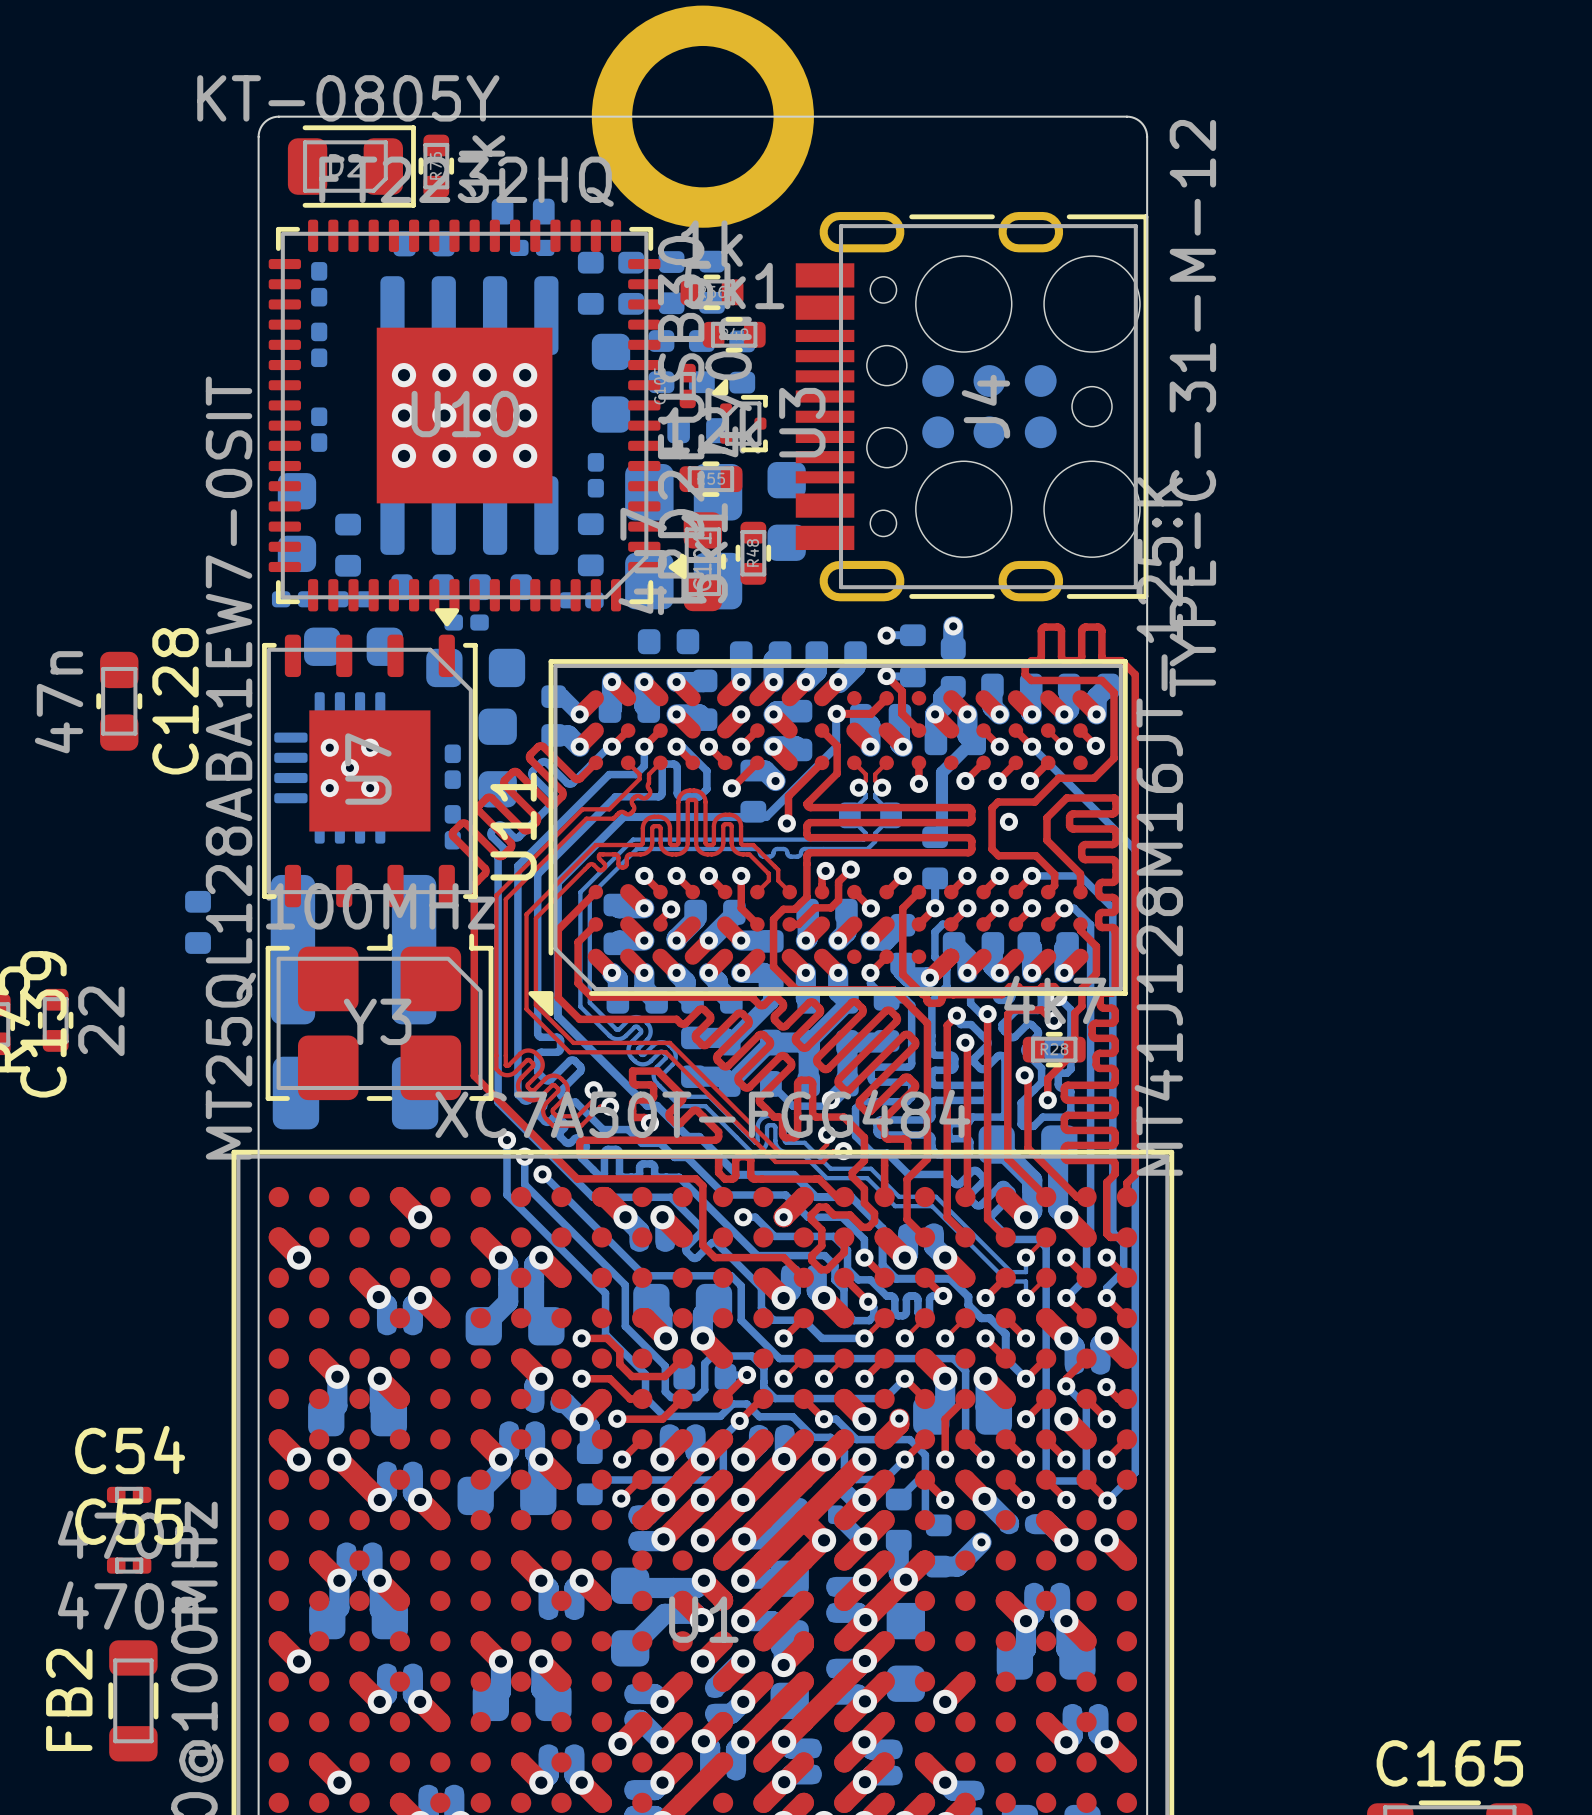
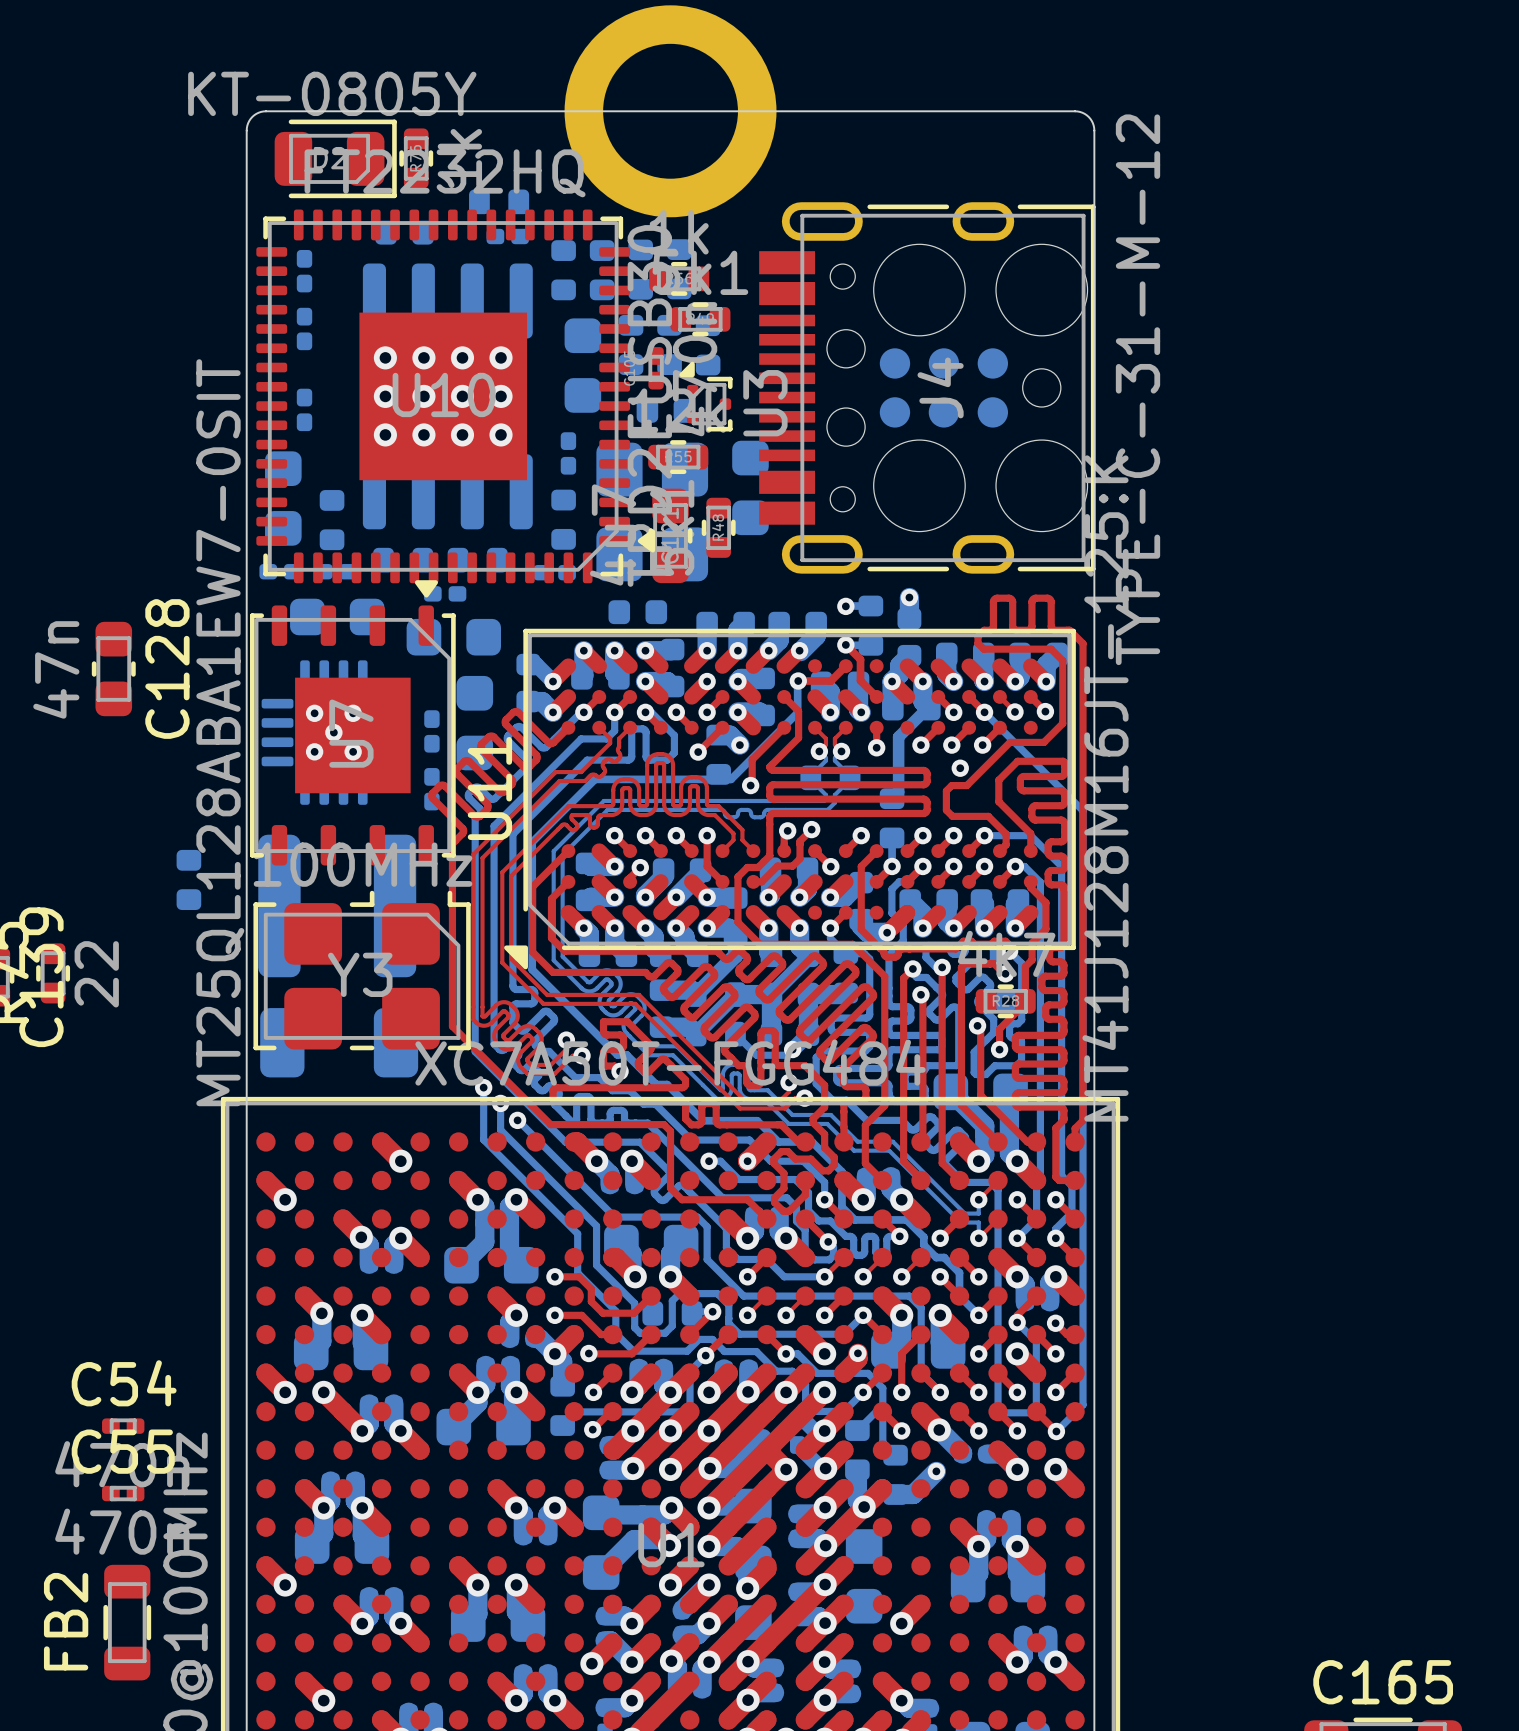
top track: (1034, 802) (998, 802) (992, 808) (992, 829) -> (987, 765) (966, 785) (951, 785) (946, 790)
via position: (1008, 821) -> (960, 768)

